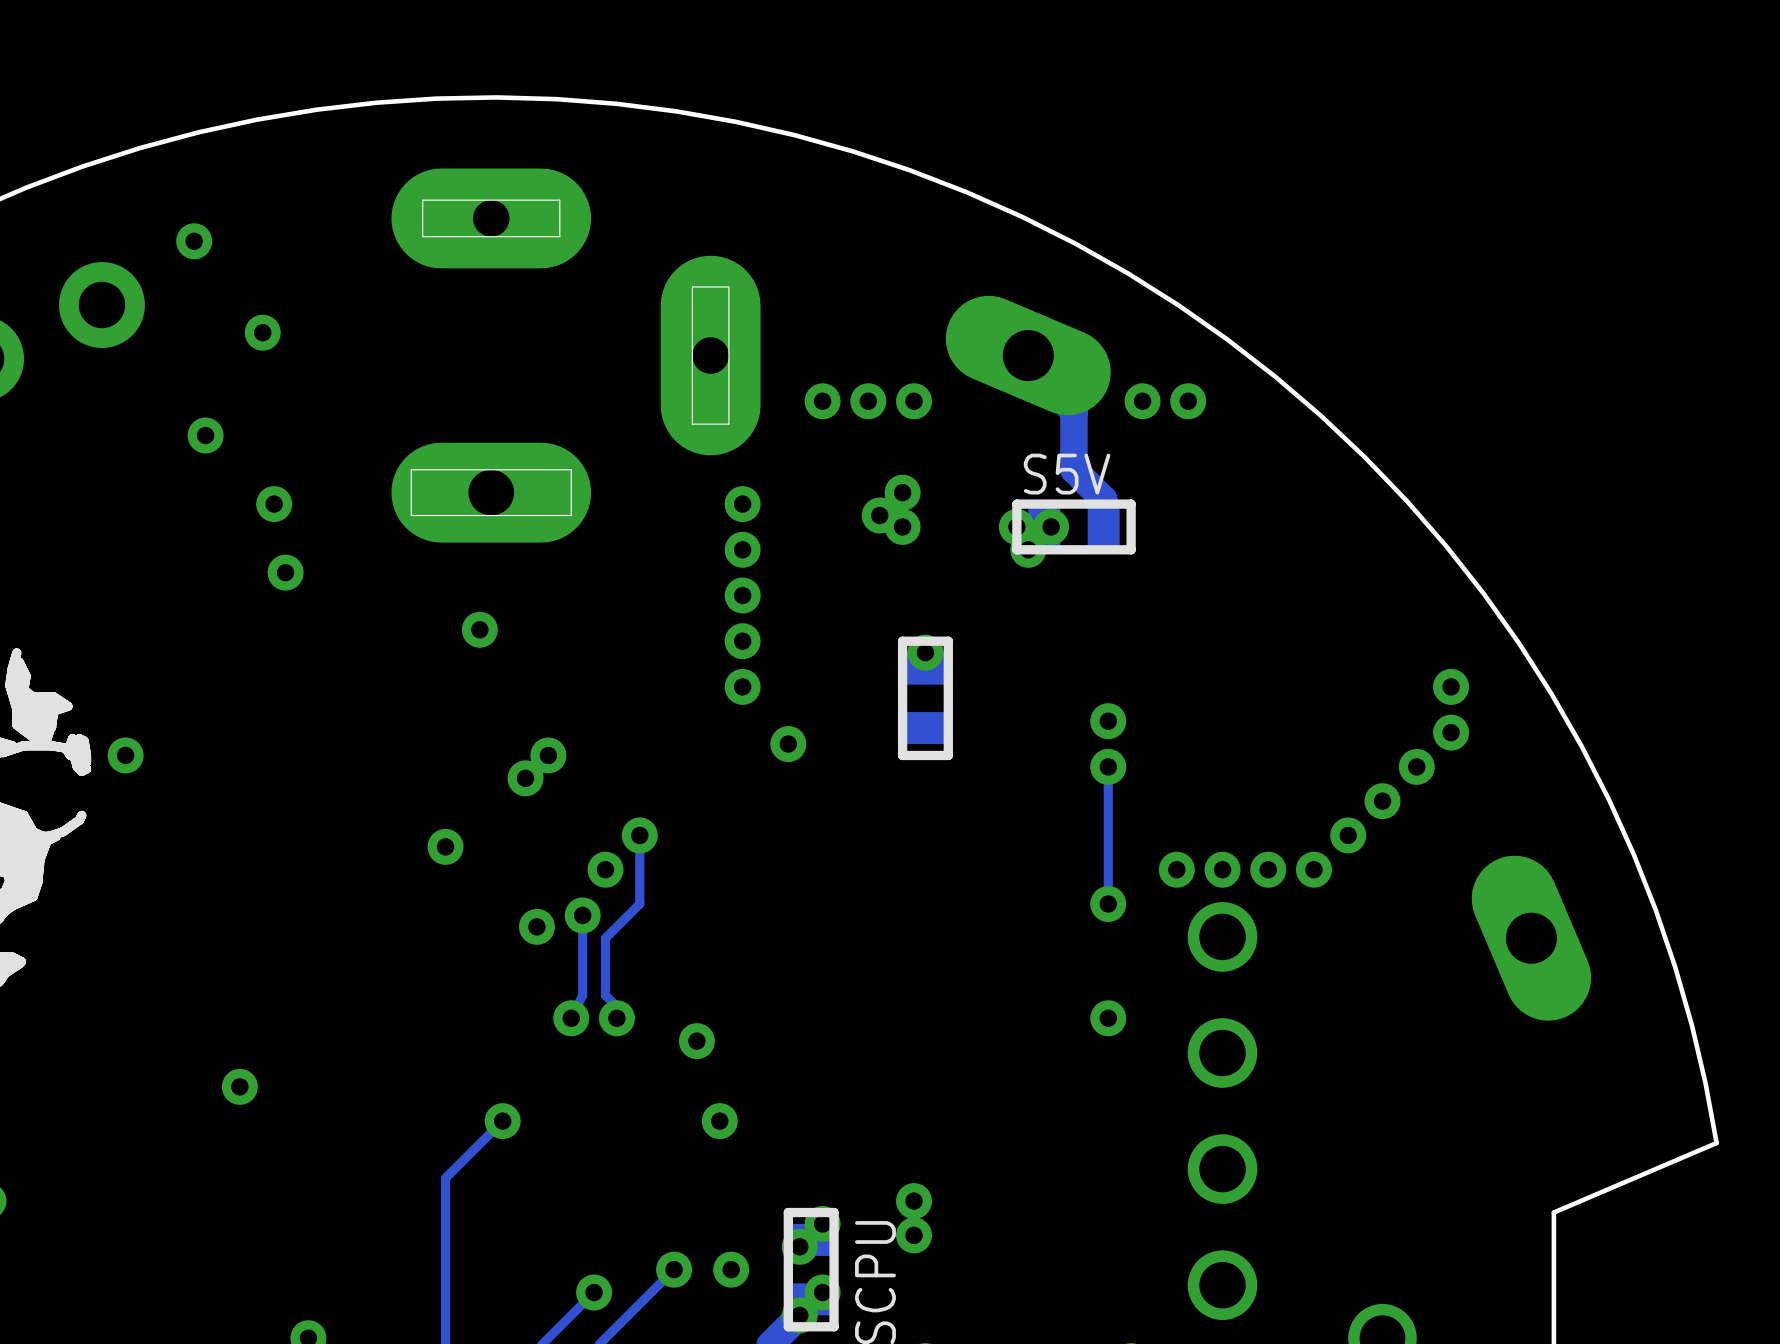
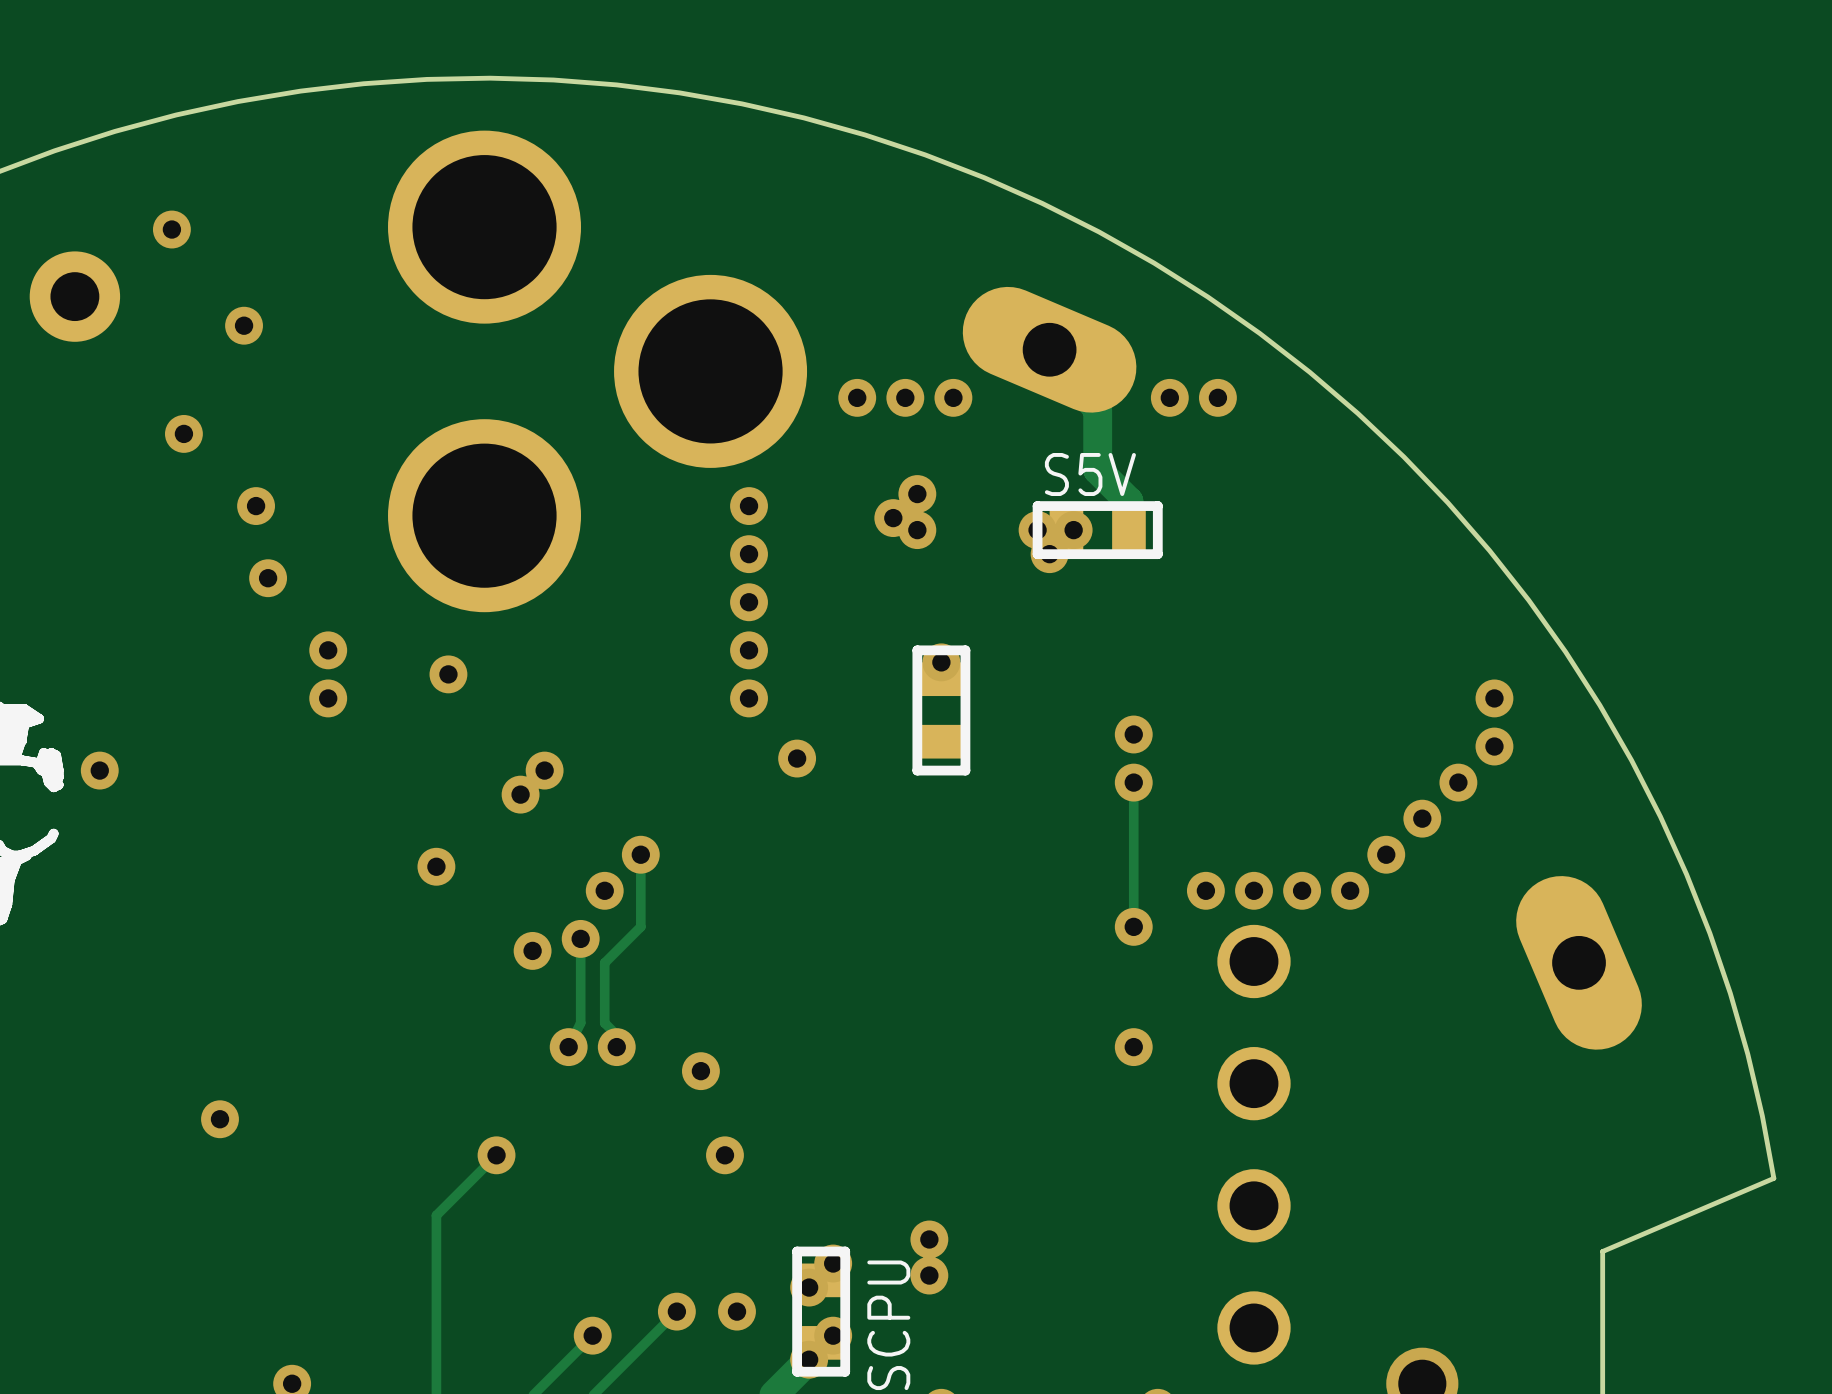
part footprint: [391, 168, 761, 543] -> [388, 130, 808, 613]
via: (822, 401) -> none
via: none -> (857, 397)
via: (868, 401) -> none
via: none -> (905, 397)
via: (914, 401) -> none
via: none -> (953, 397)
via position: (479, 629) -> (448, 674)
via: none -> (328, 650)
via: none -> (328, 698)

